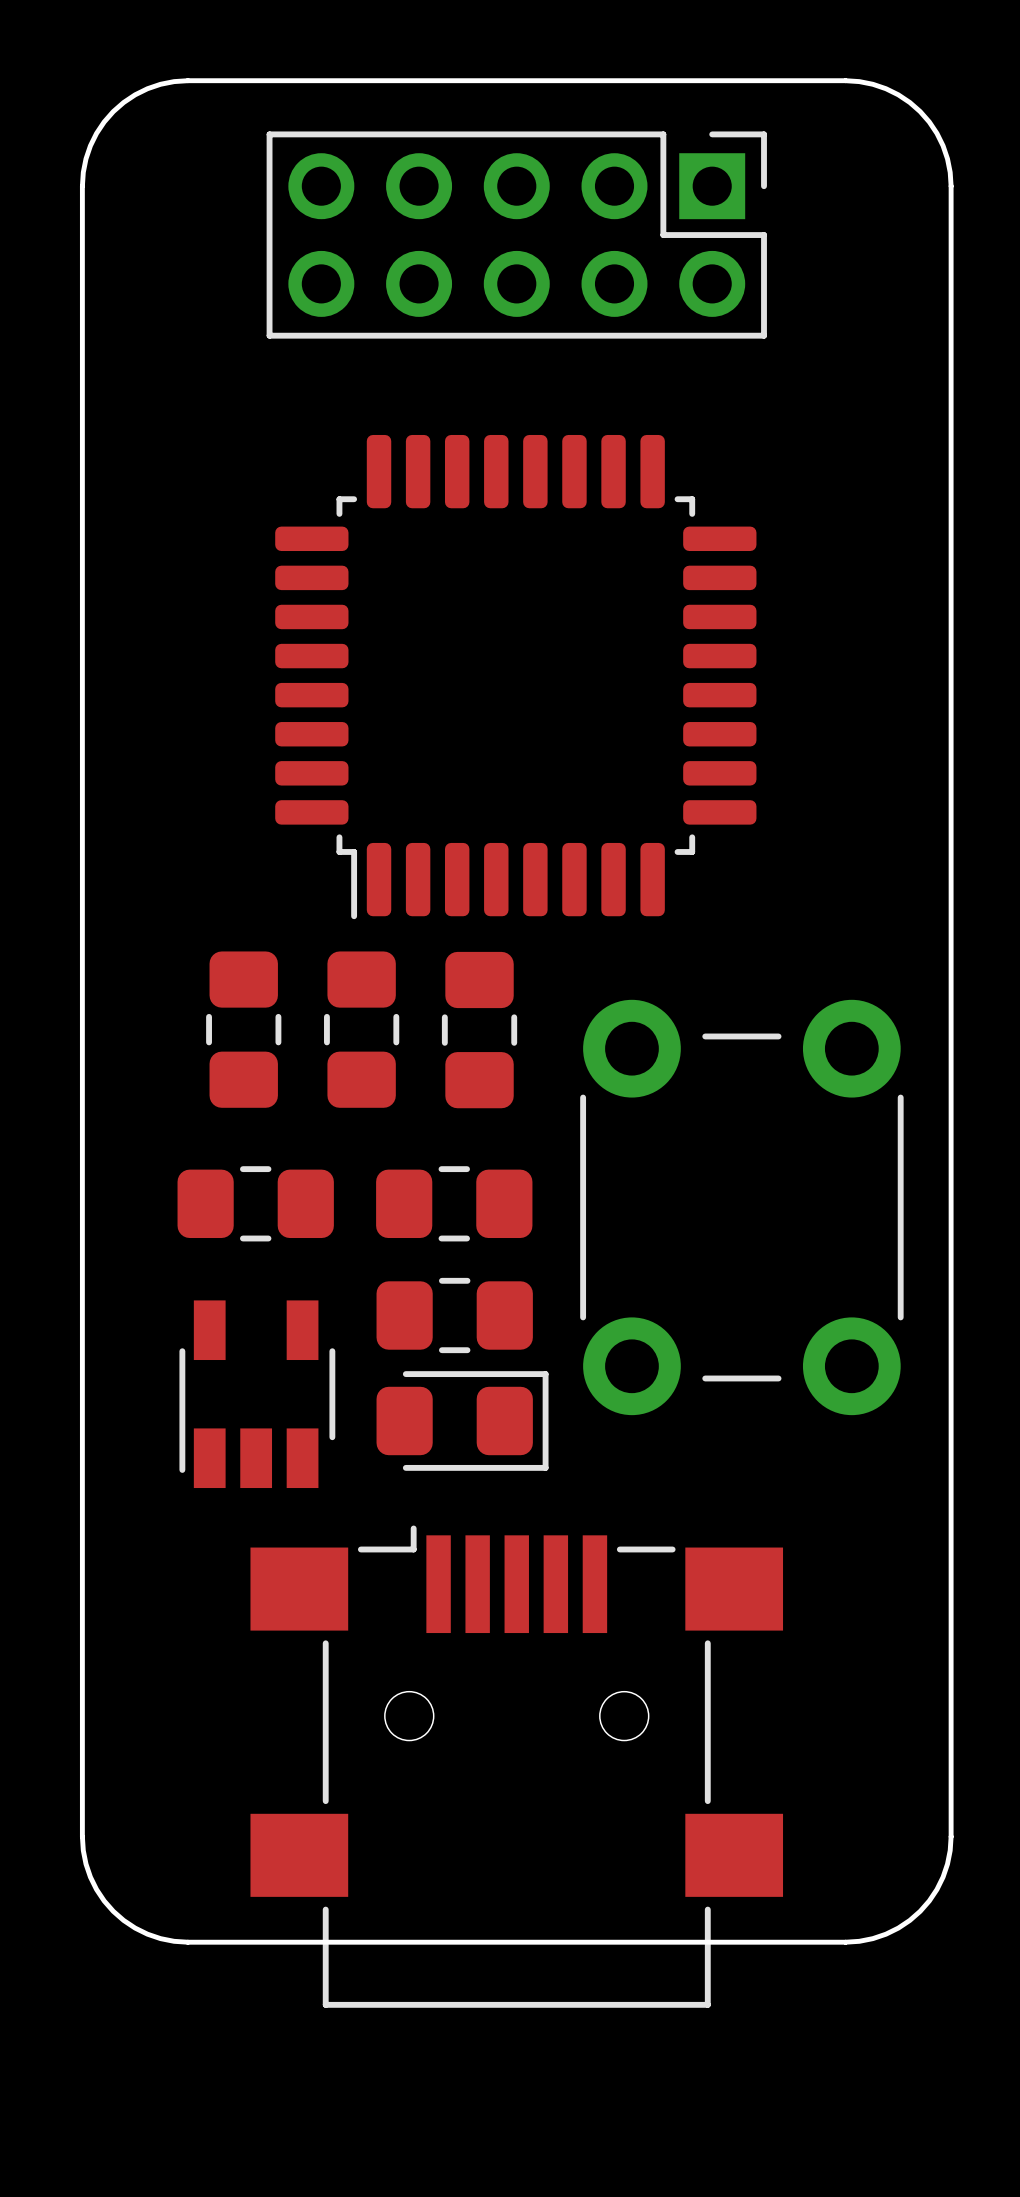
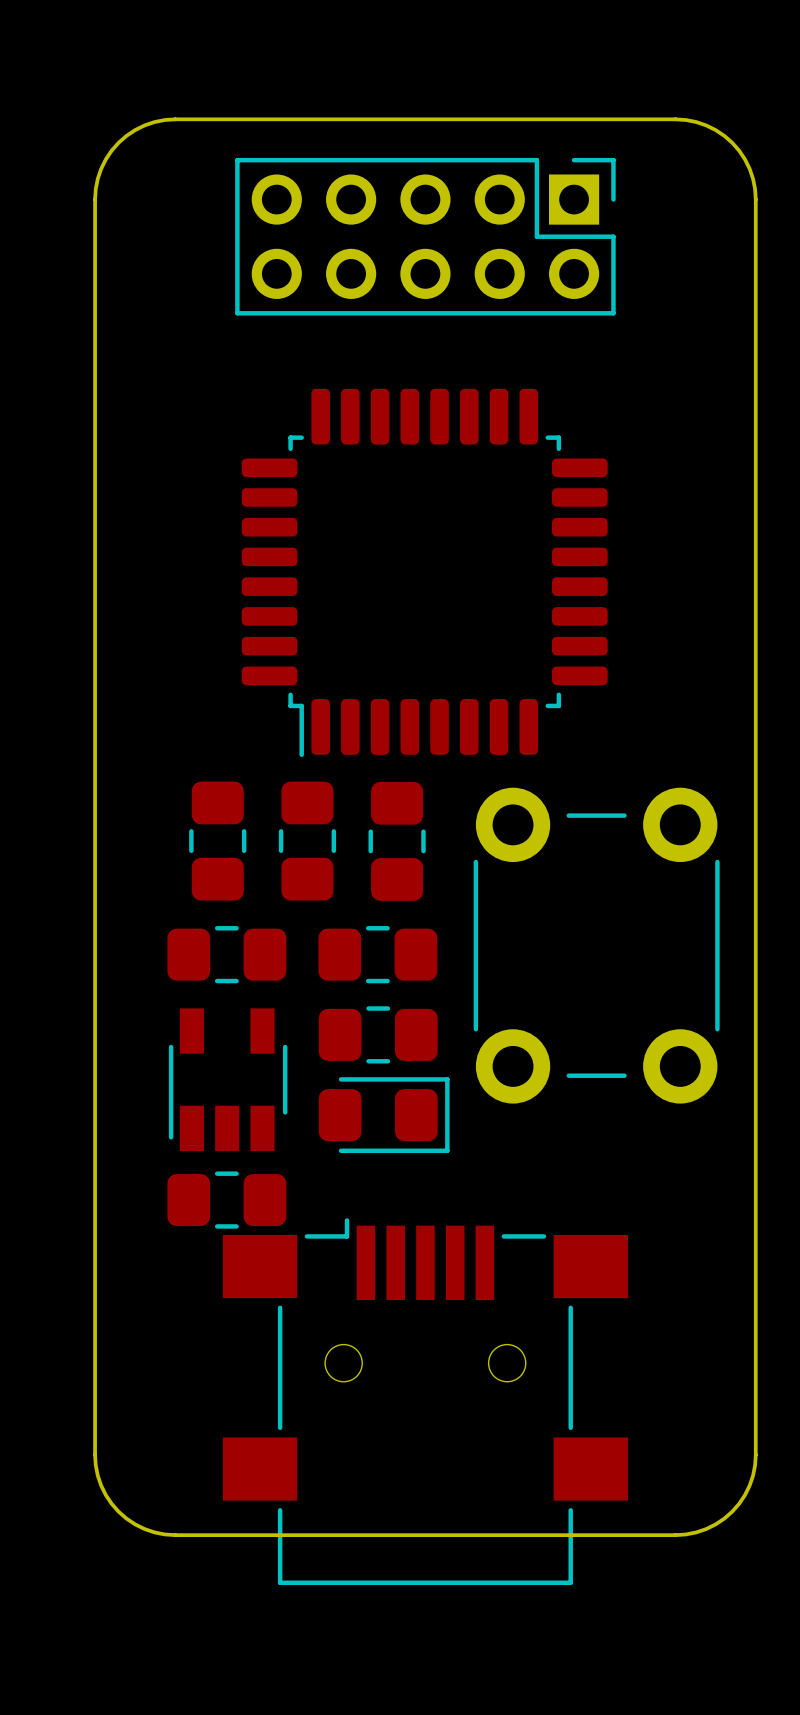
part position: (255, 1203) -> (226, 954)
part position: (454, 1203) -> (377, 954)
part position: (741, 1207) -> (596, 945)
part position: (454, 1315) -> (378, 1034)
part position: (257, 1394) -> (228, 1079)
part position: (462, 1420) -> (384, 1115)
part: none -> (226, 1200)

